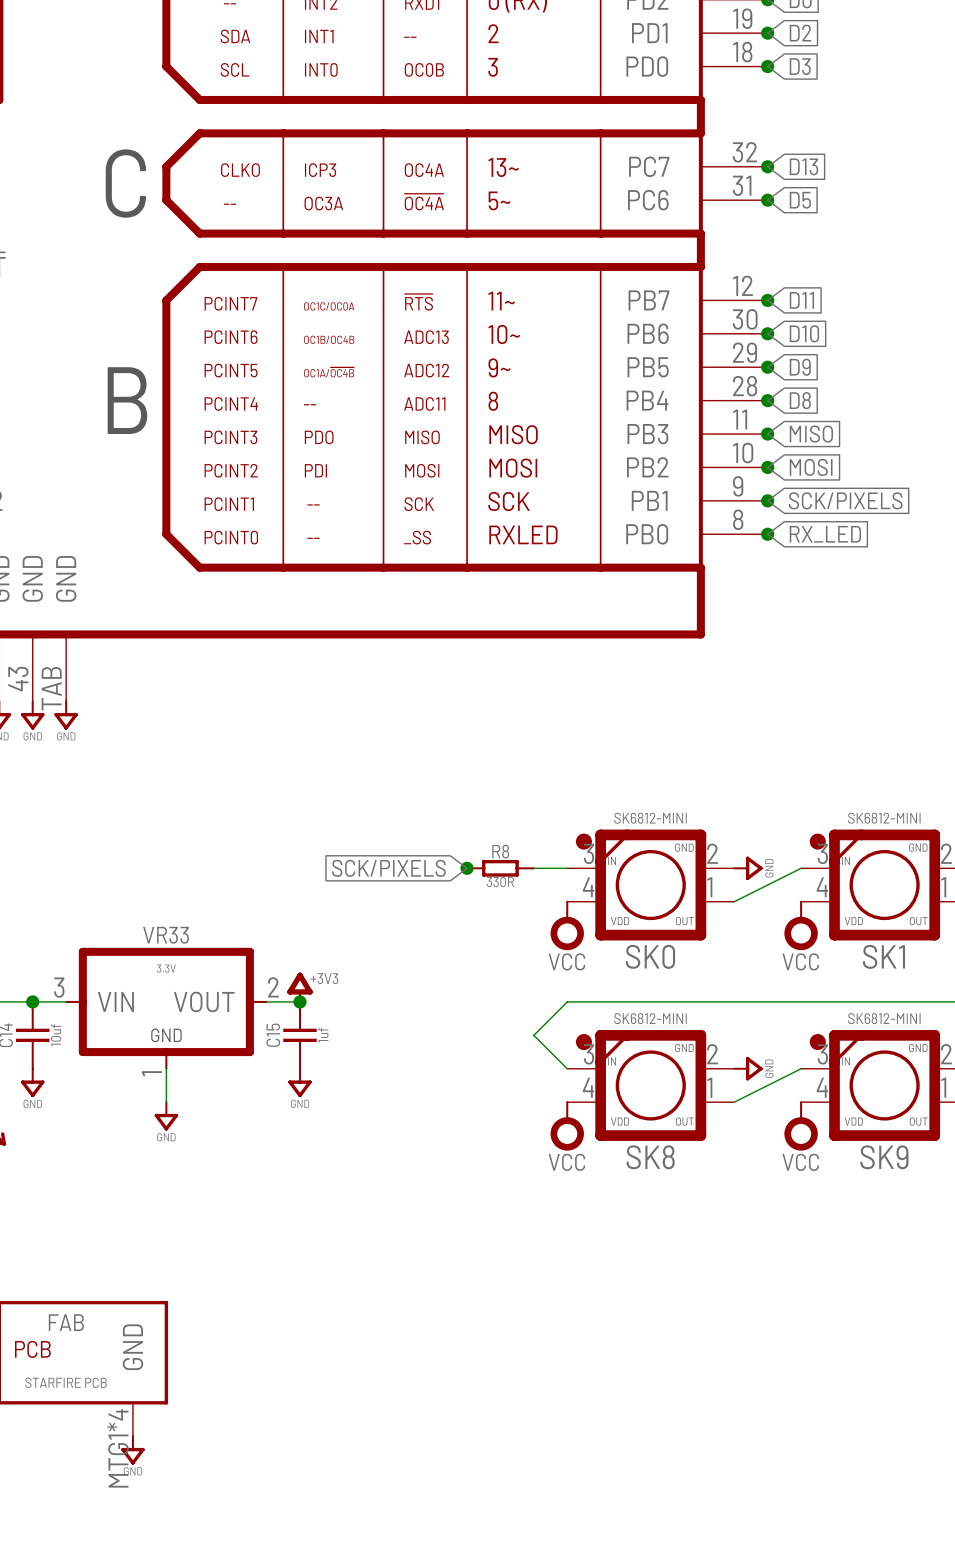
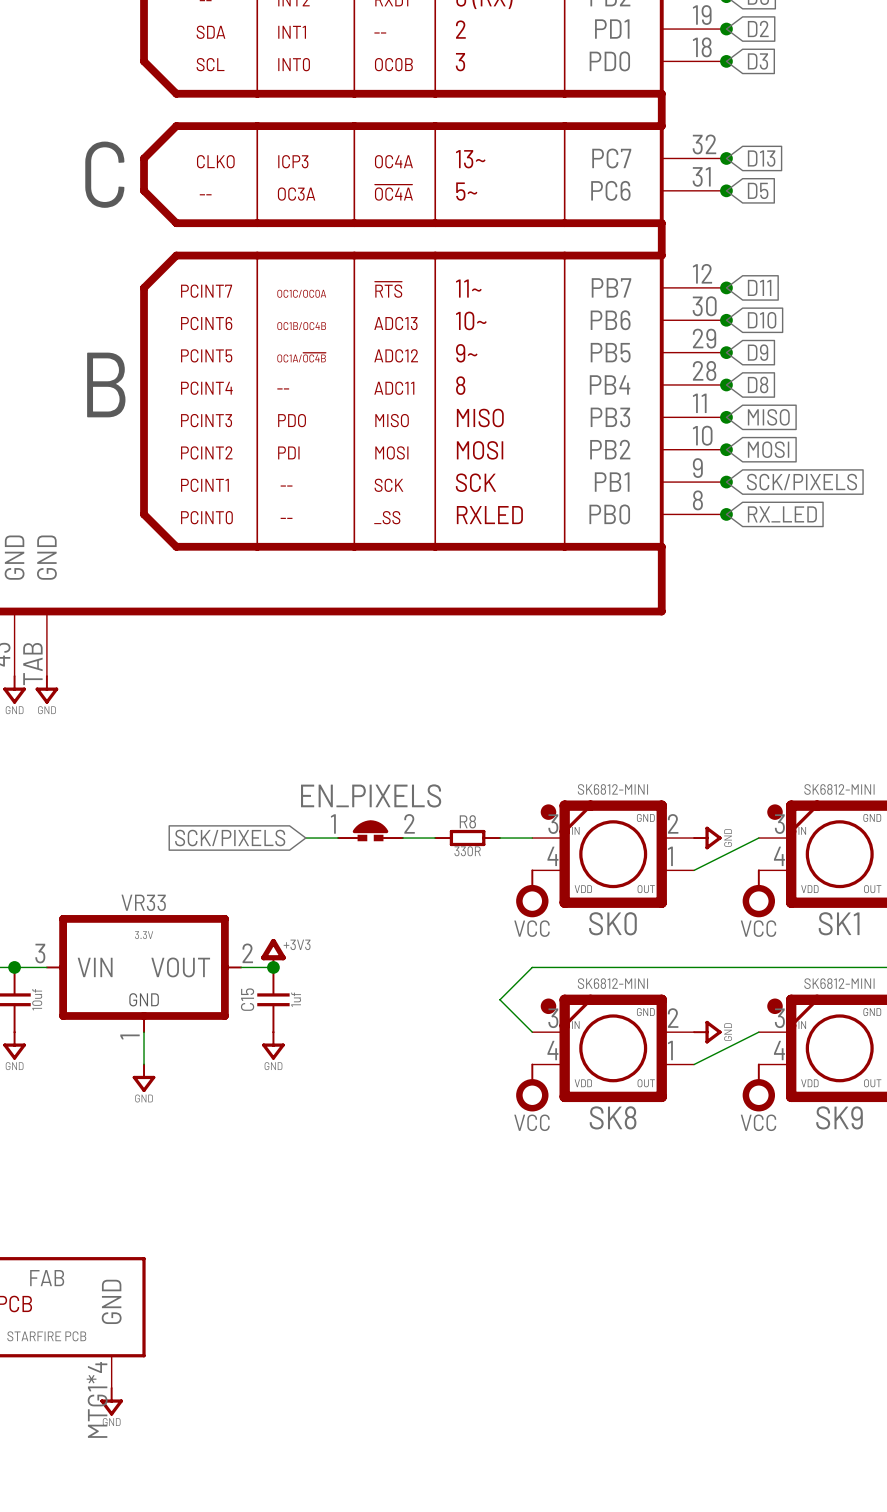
EN_PIXELS: none -> (370, 830)
wire: none -> (305, 838) (338, 838)
global label position: SCK/PIXELS (388, 868) -> SCK/PIXELS (230, 838)
wire: none -> (402, 838) (435, 838)
junction: (467, 868) -> none

